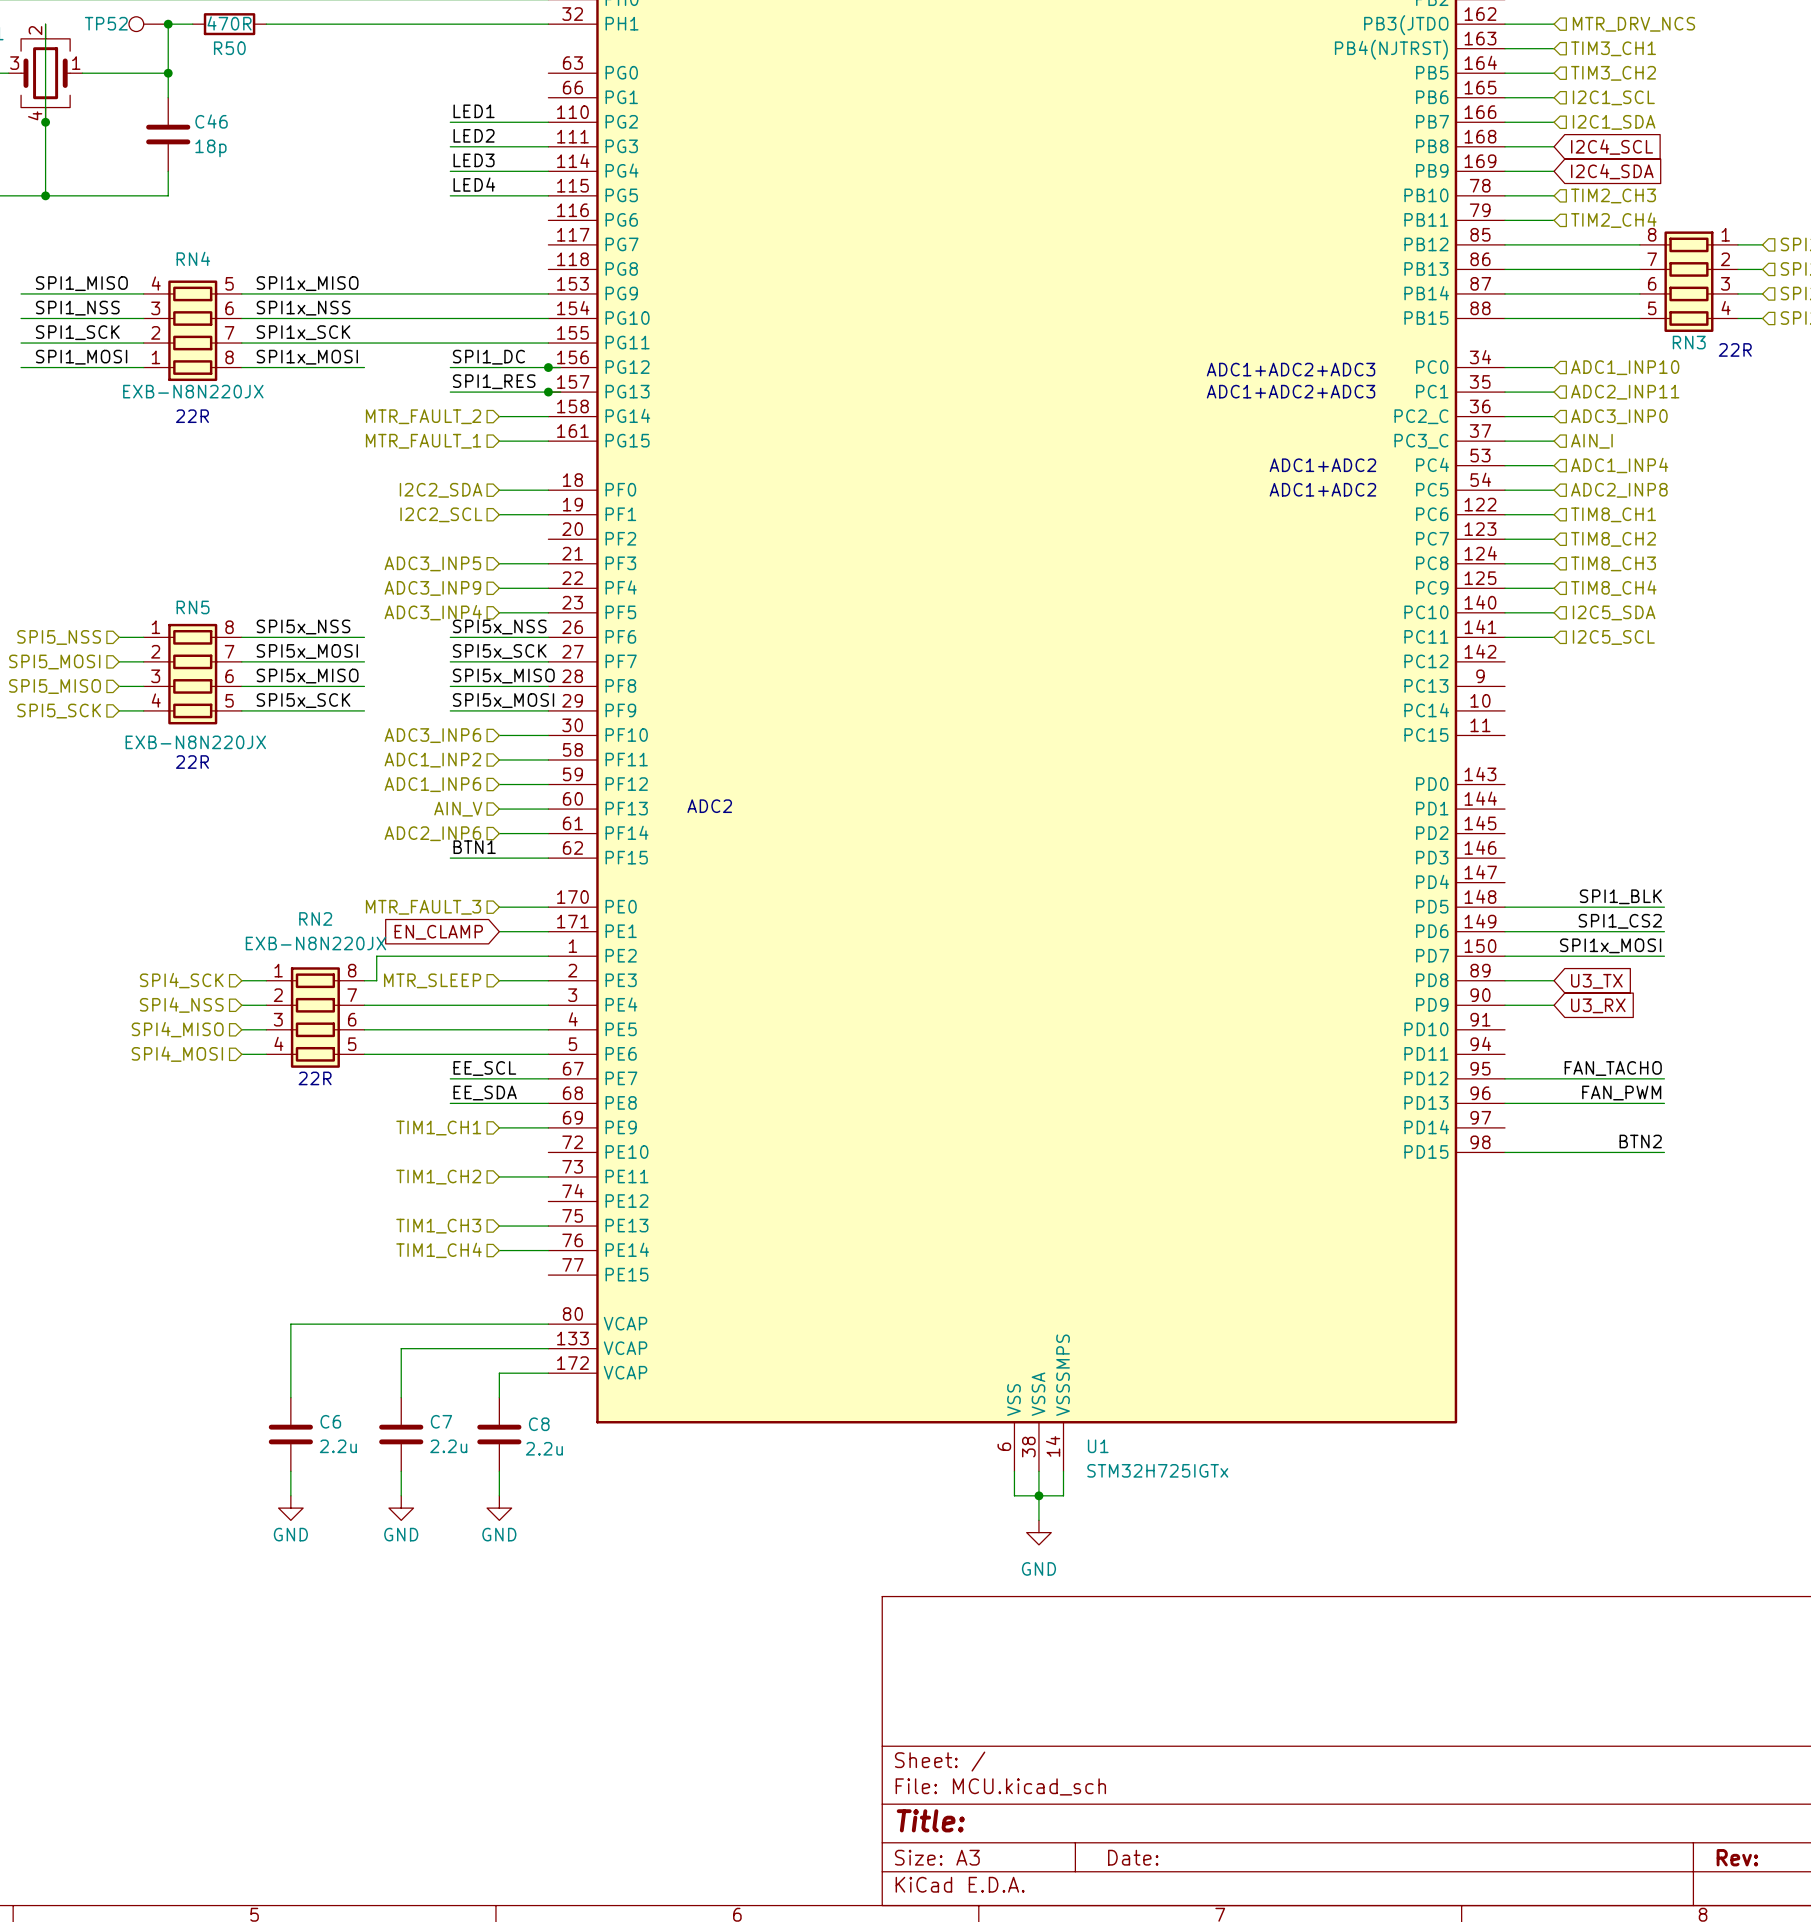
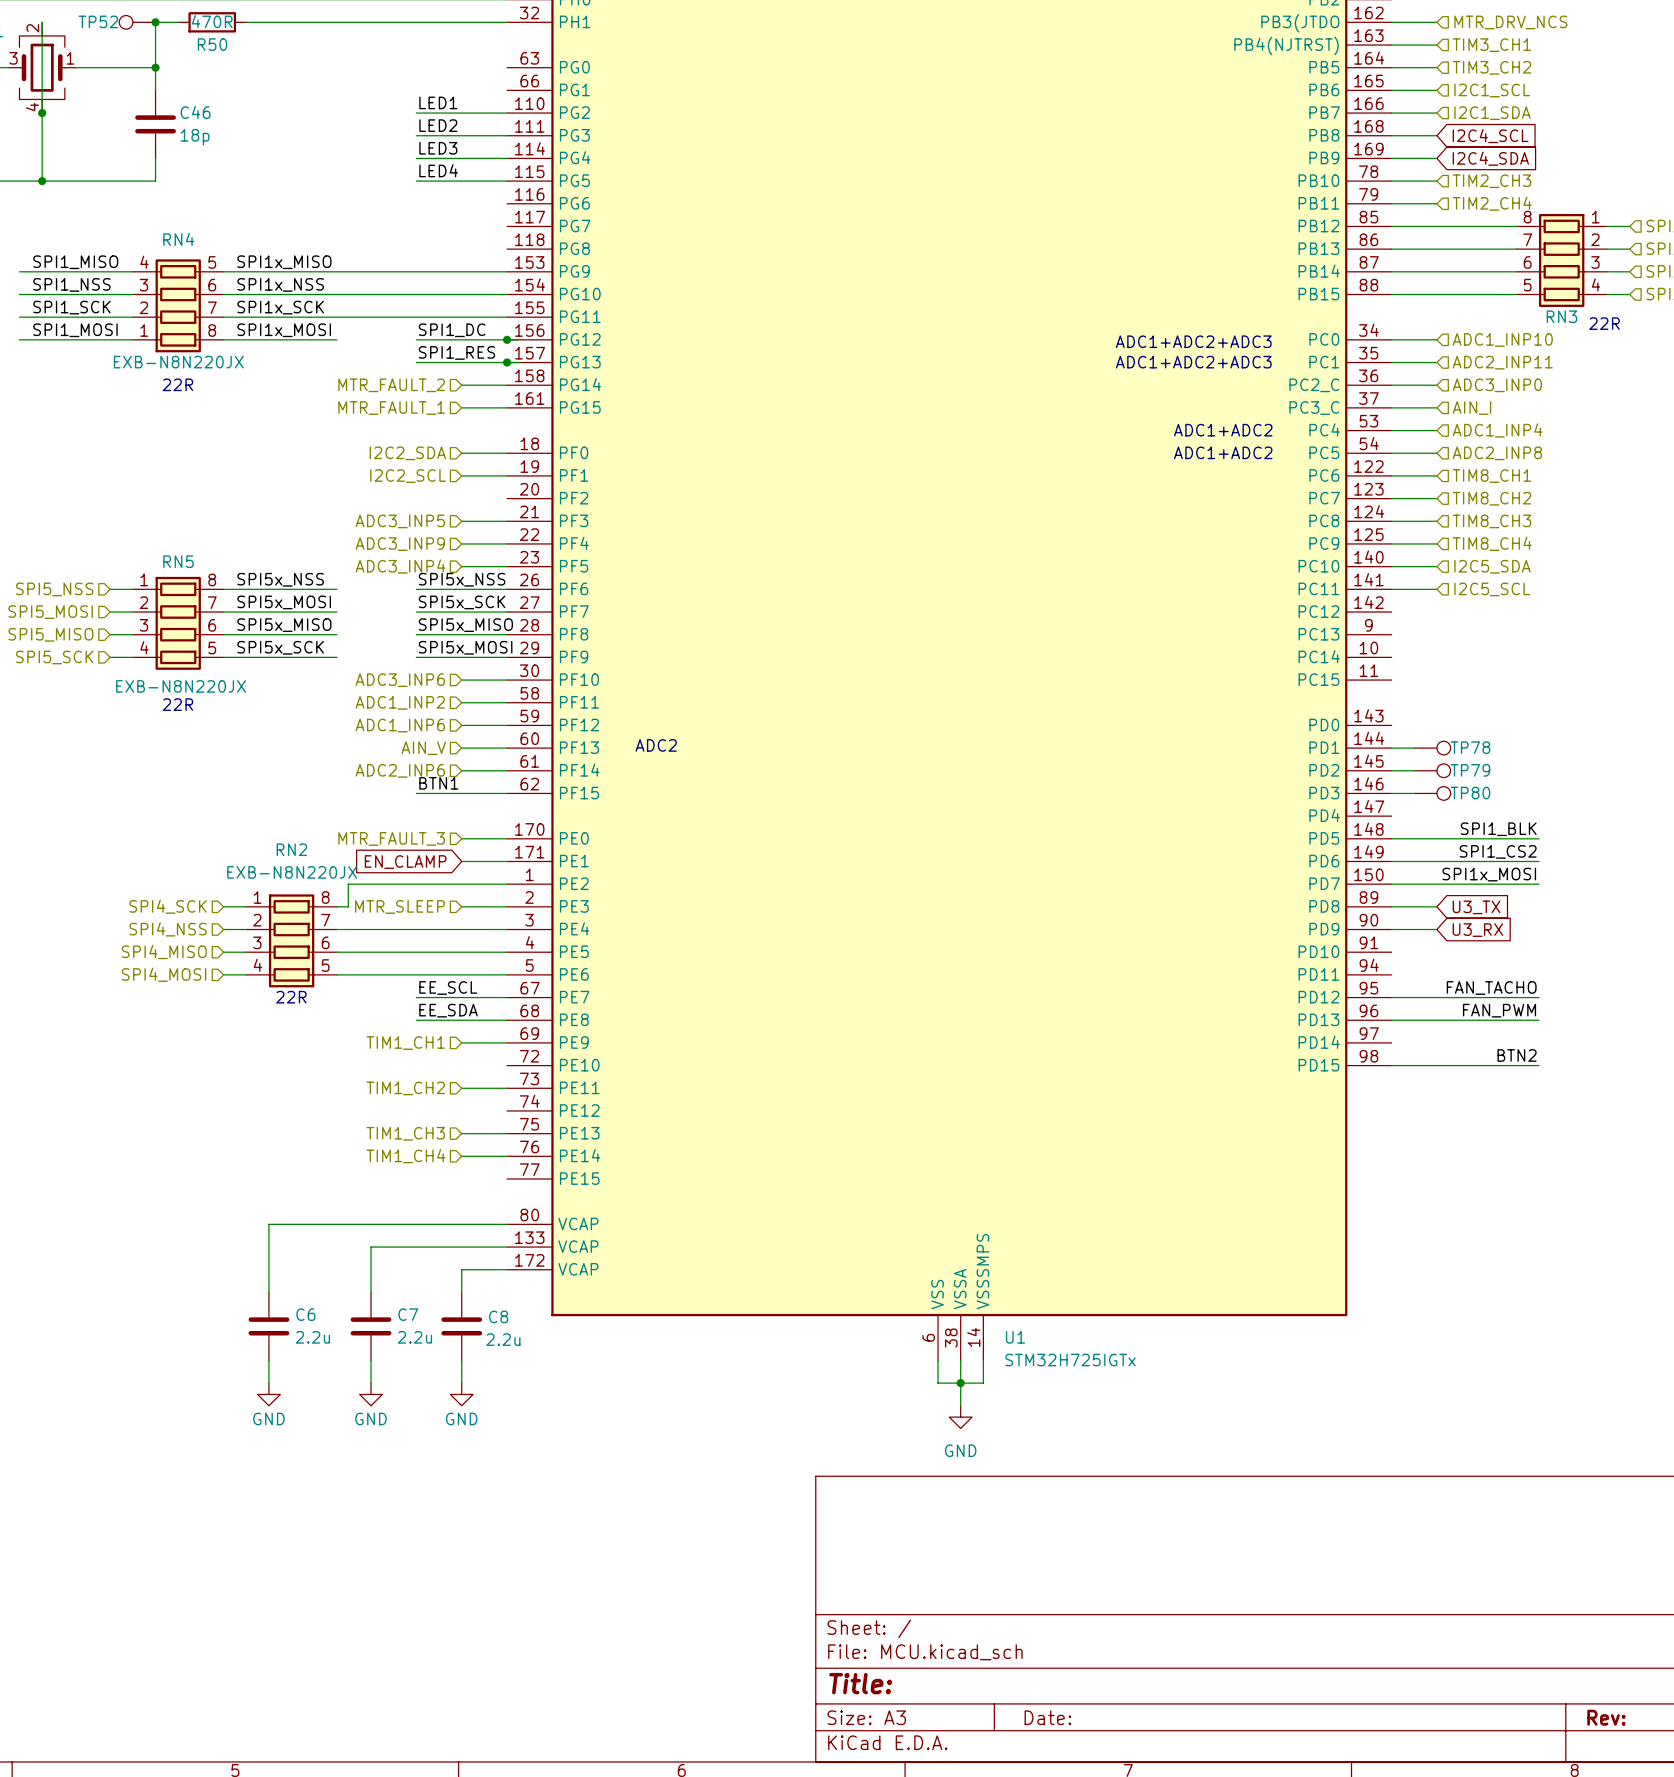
wire: none -> (1391, 748) (1414, 748)
TP78: none -> (1432, 748)
wire: none -> (1391, 770) (1414, 770)
TP79: none -> (1432, 770)
wire: none -> (1391, 793) (1414, 793)
TP80: none -> (1432, 793)

